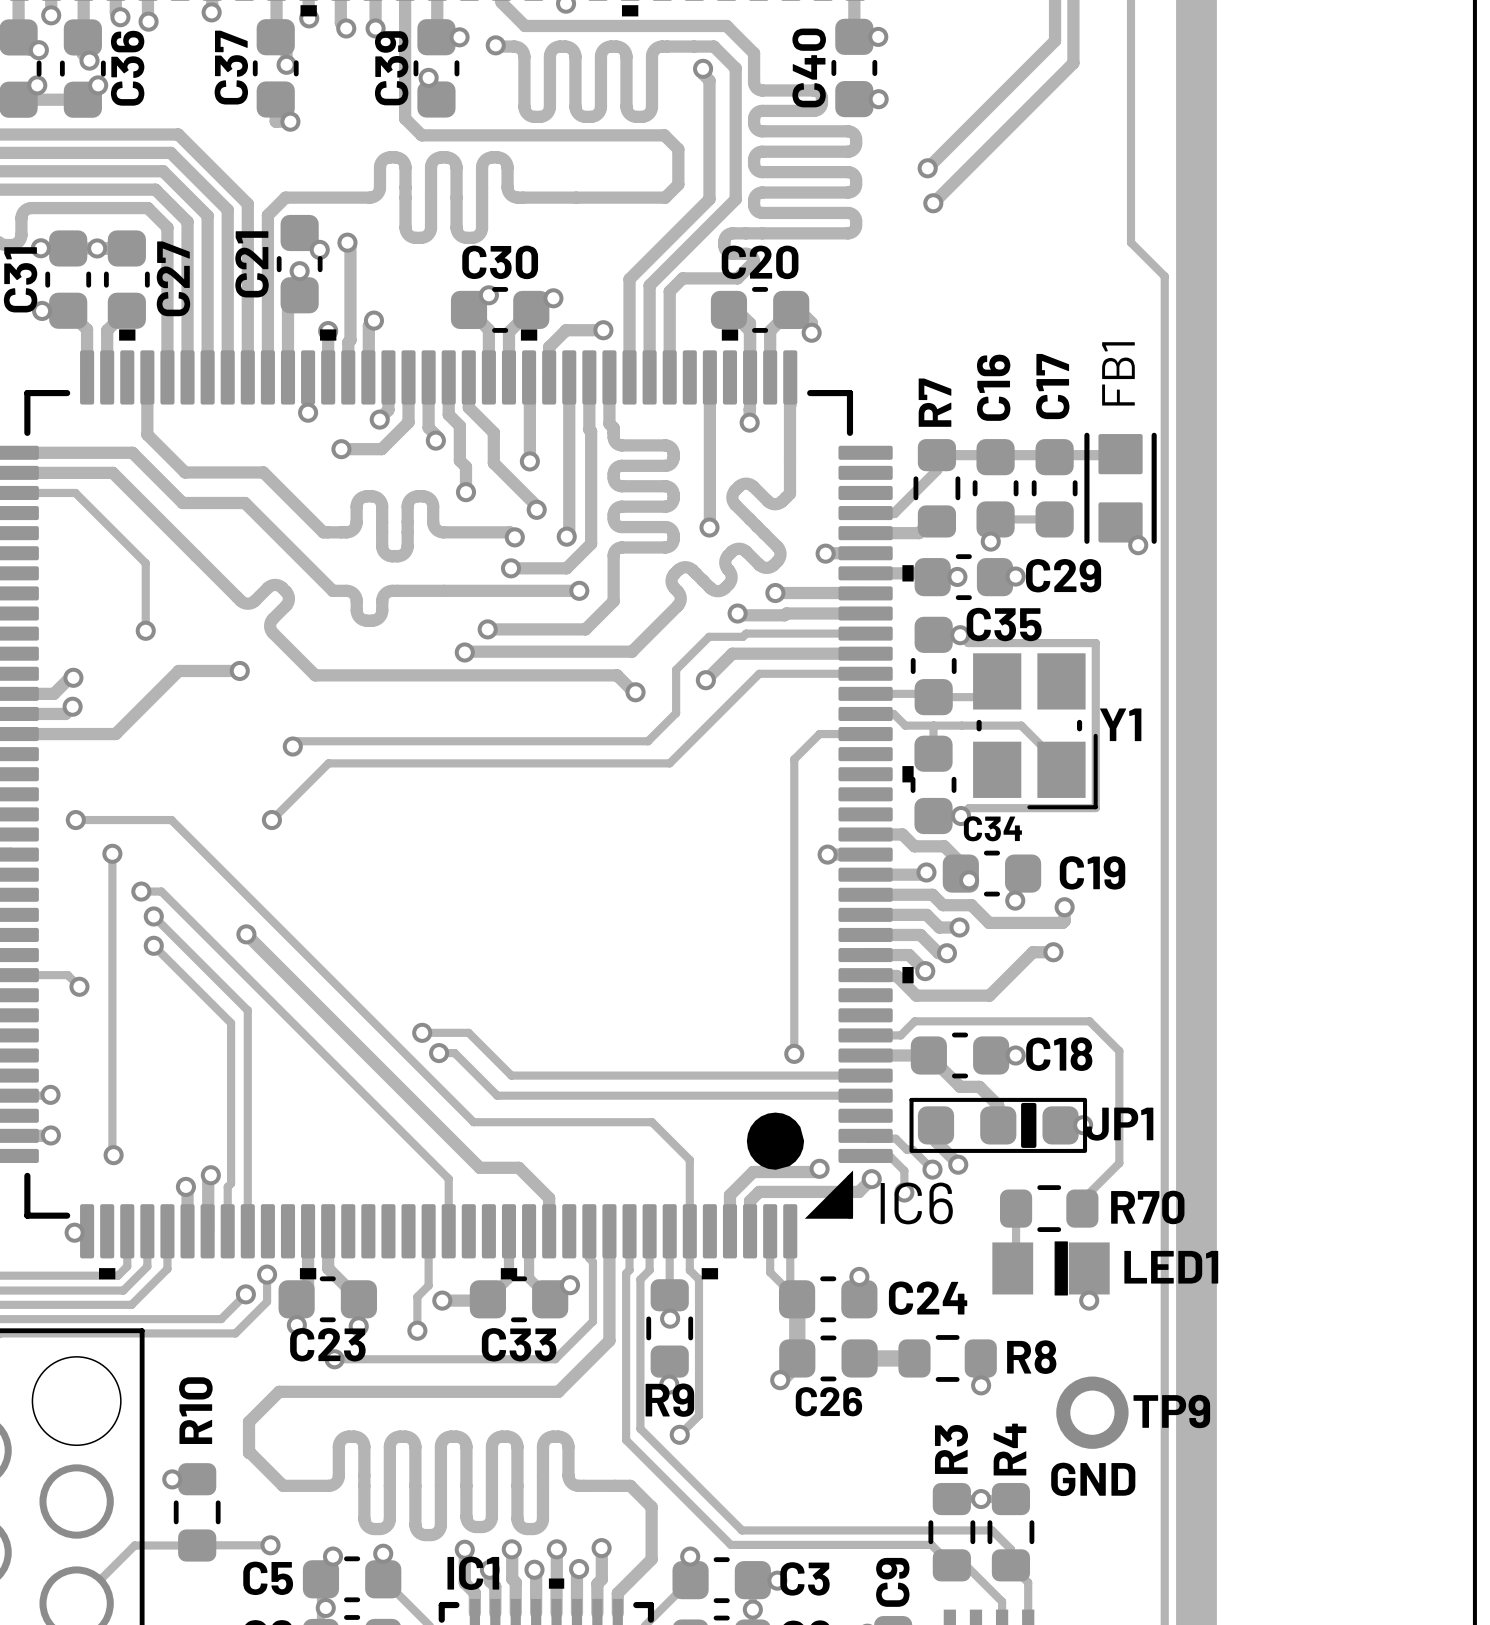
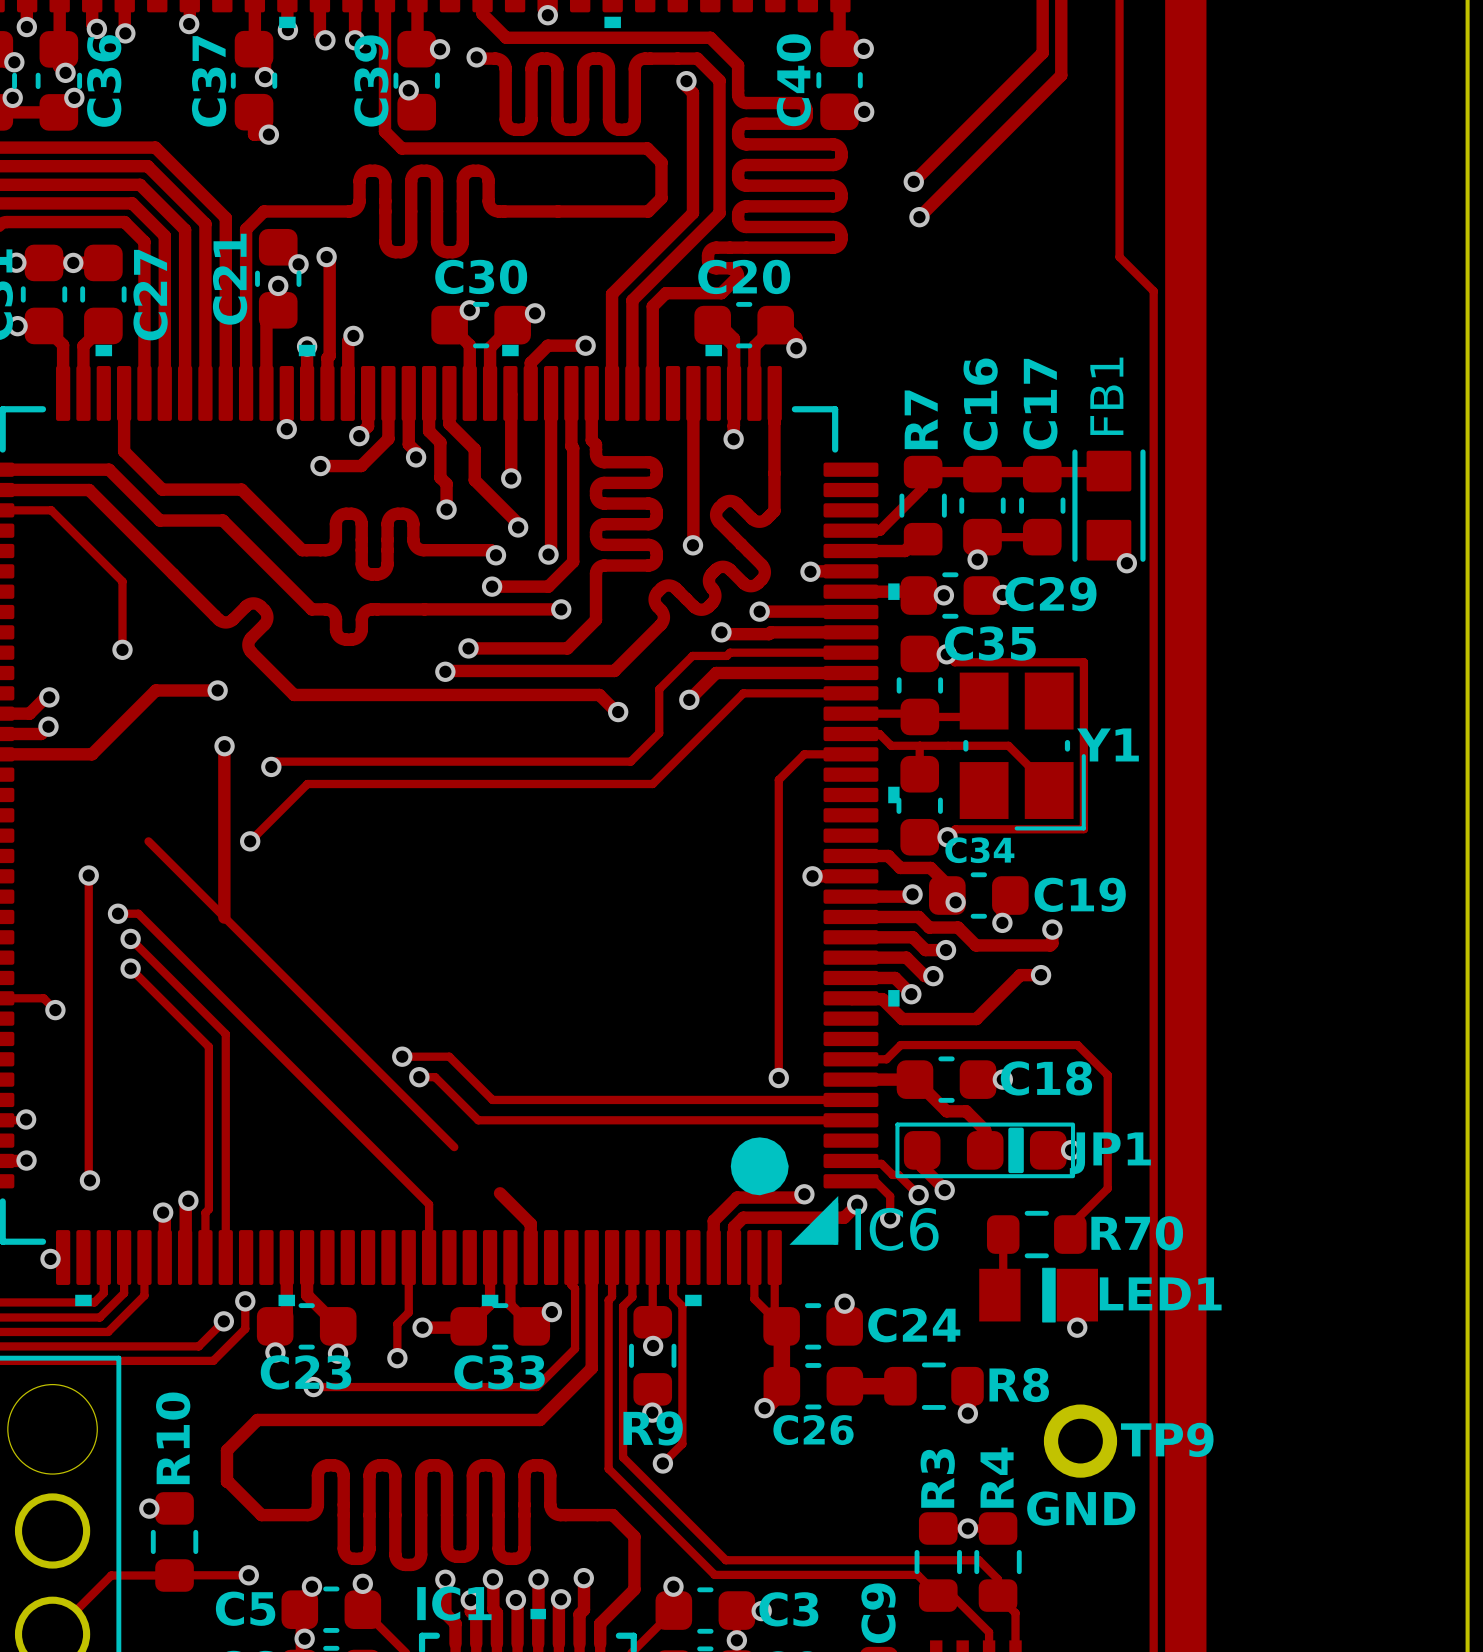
track: none -> (224, 746) (224, 917)
via: none -> (224, 746)
track: (75, 820) (171, 820) -> none
via: (75, 820) -> none
track: (246, 934) (479, 1167) (518, 1167) -> none
via: (246, 934) -> none
track: (473, 1122) (652, 1122) (689, 1159) (689, 1231) -> none

